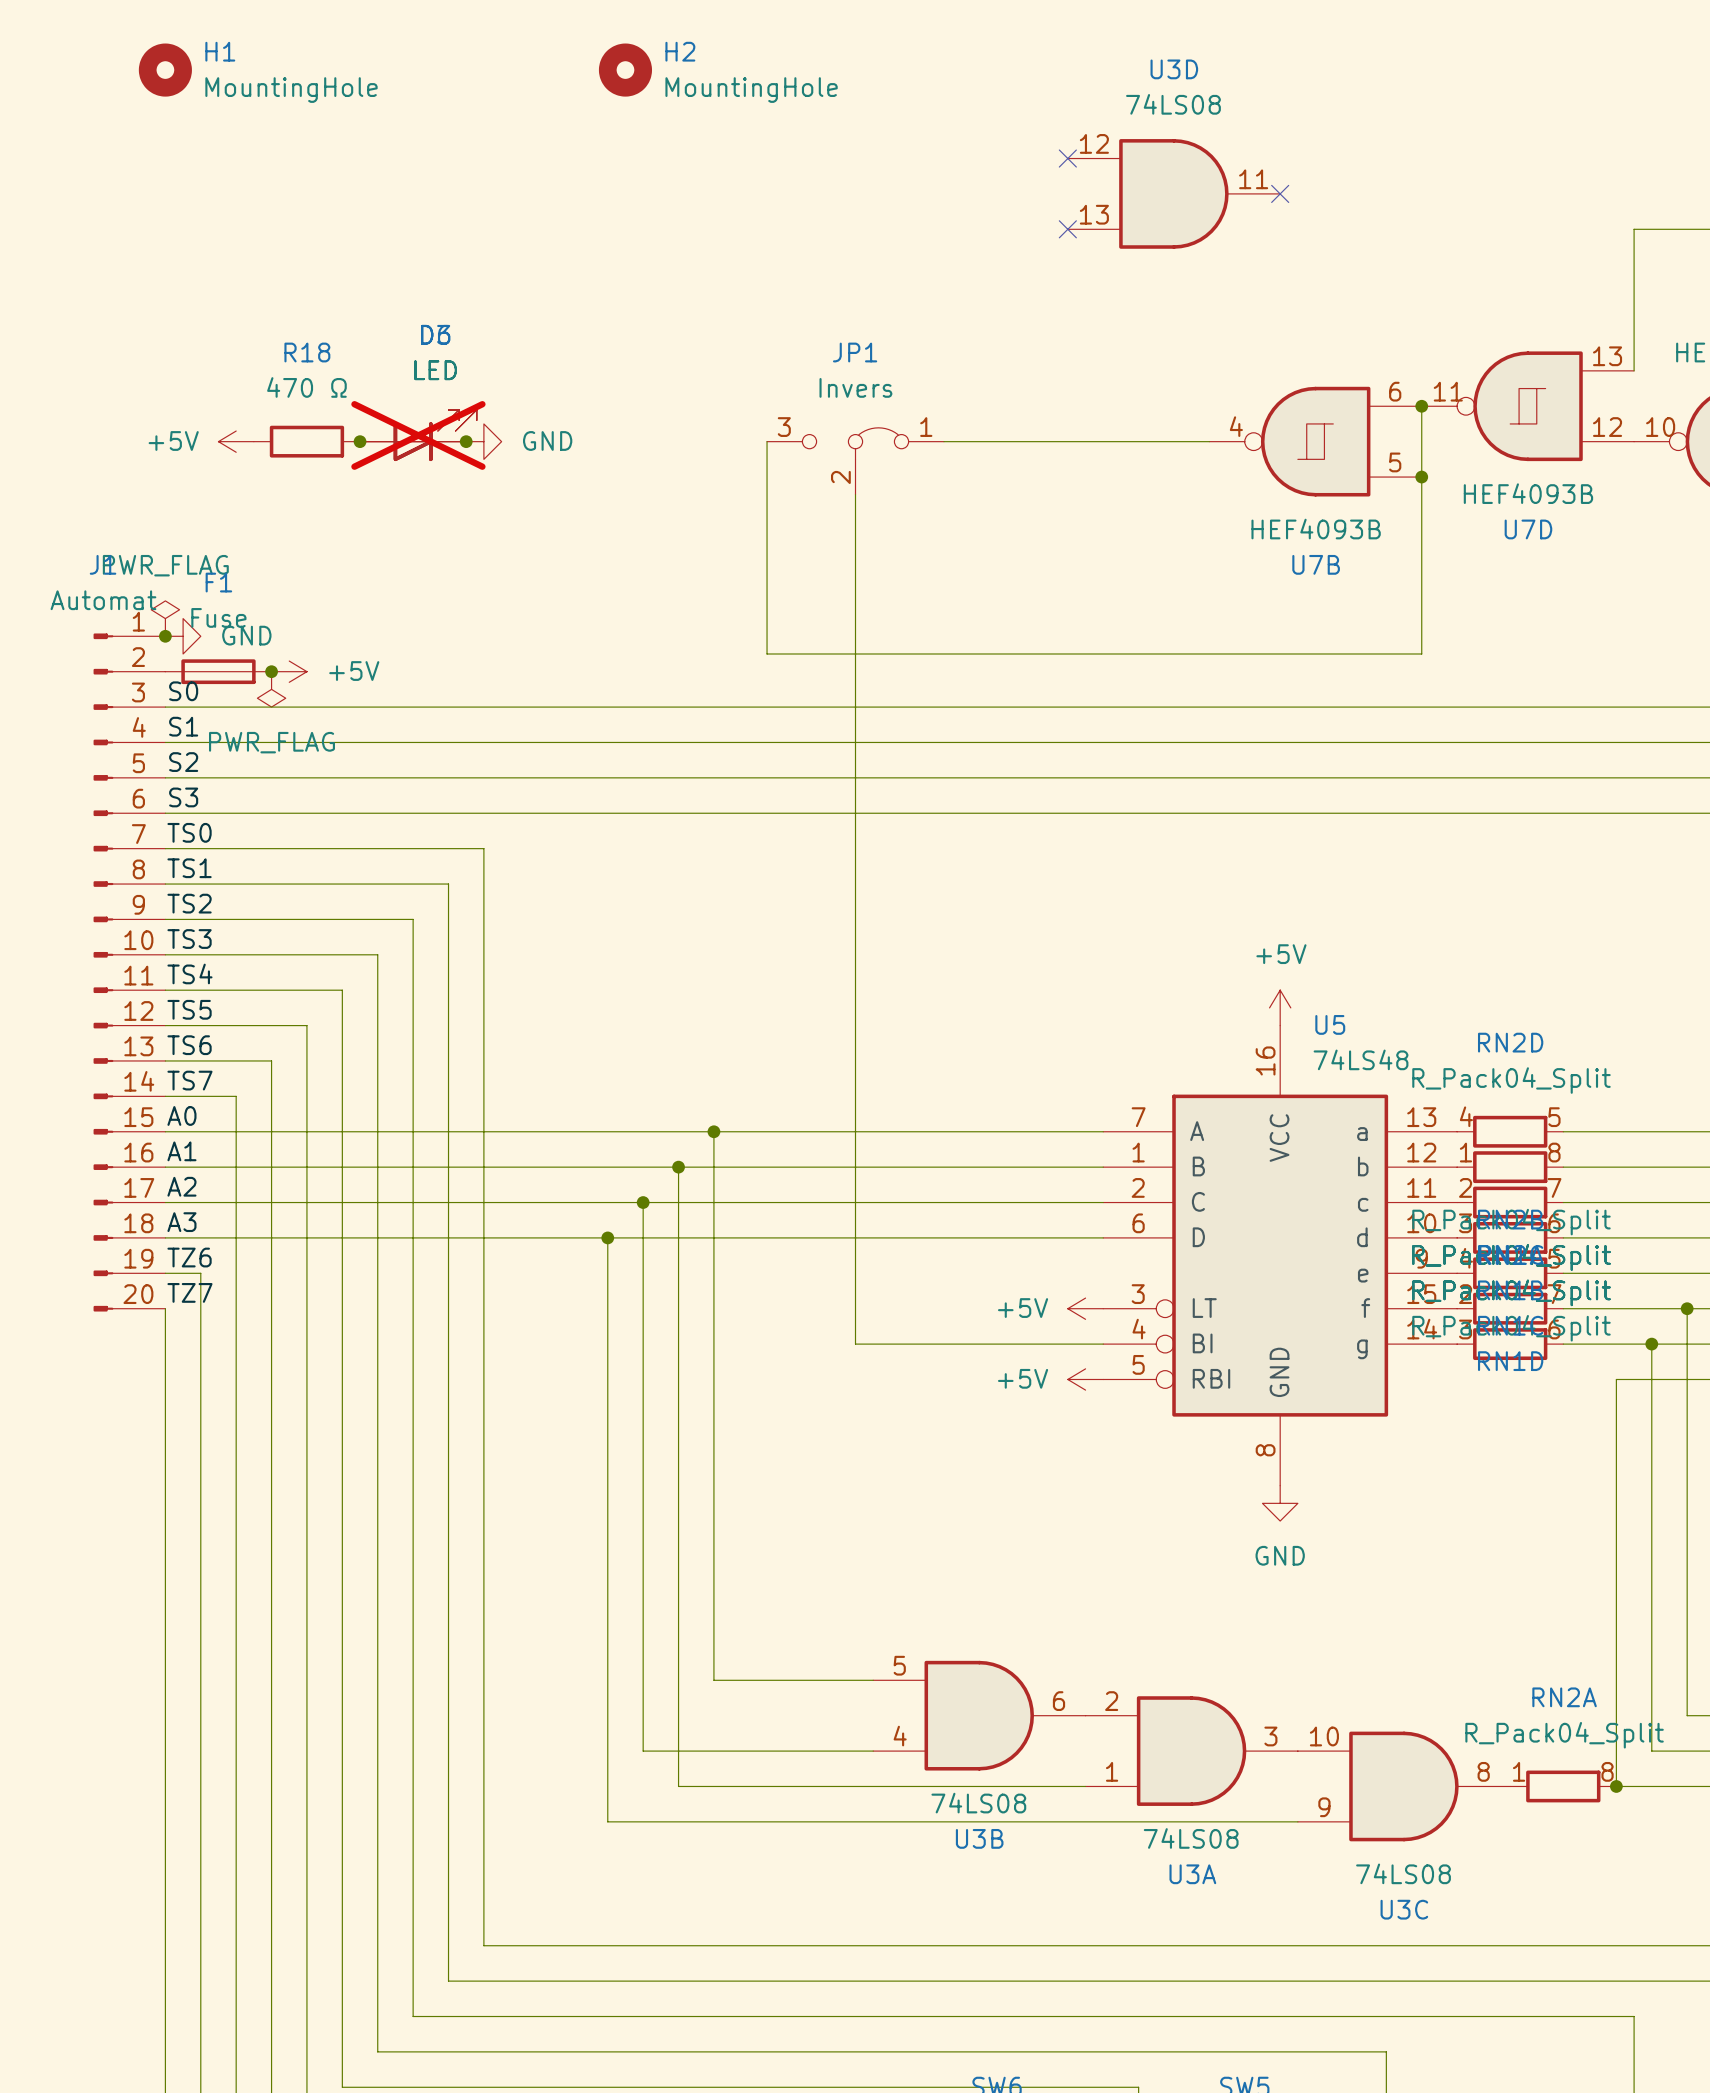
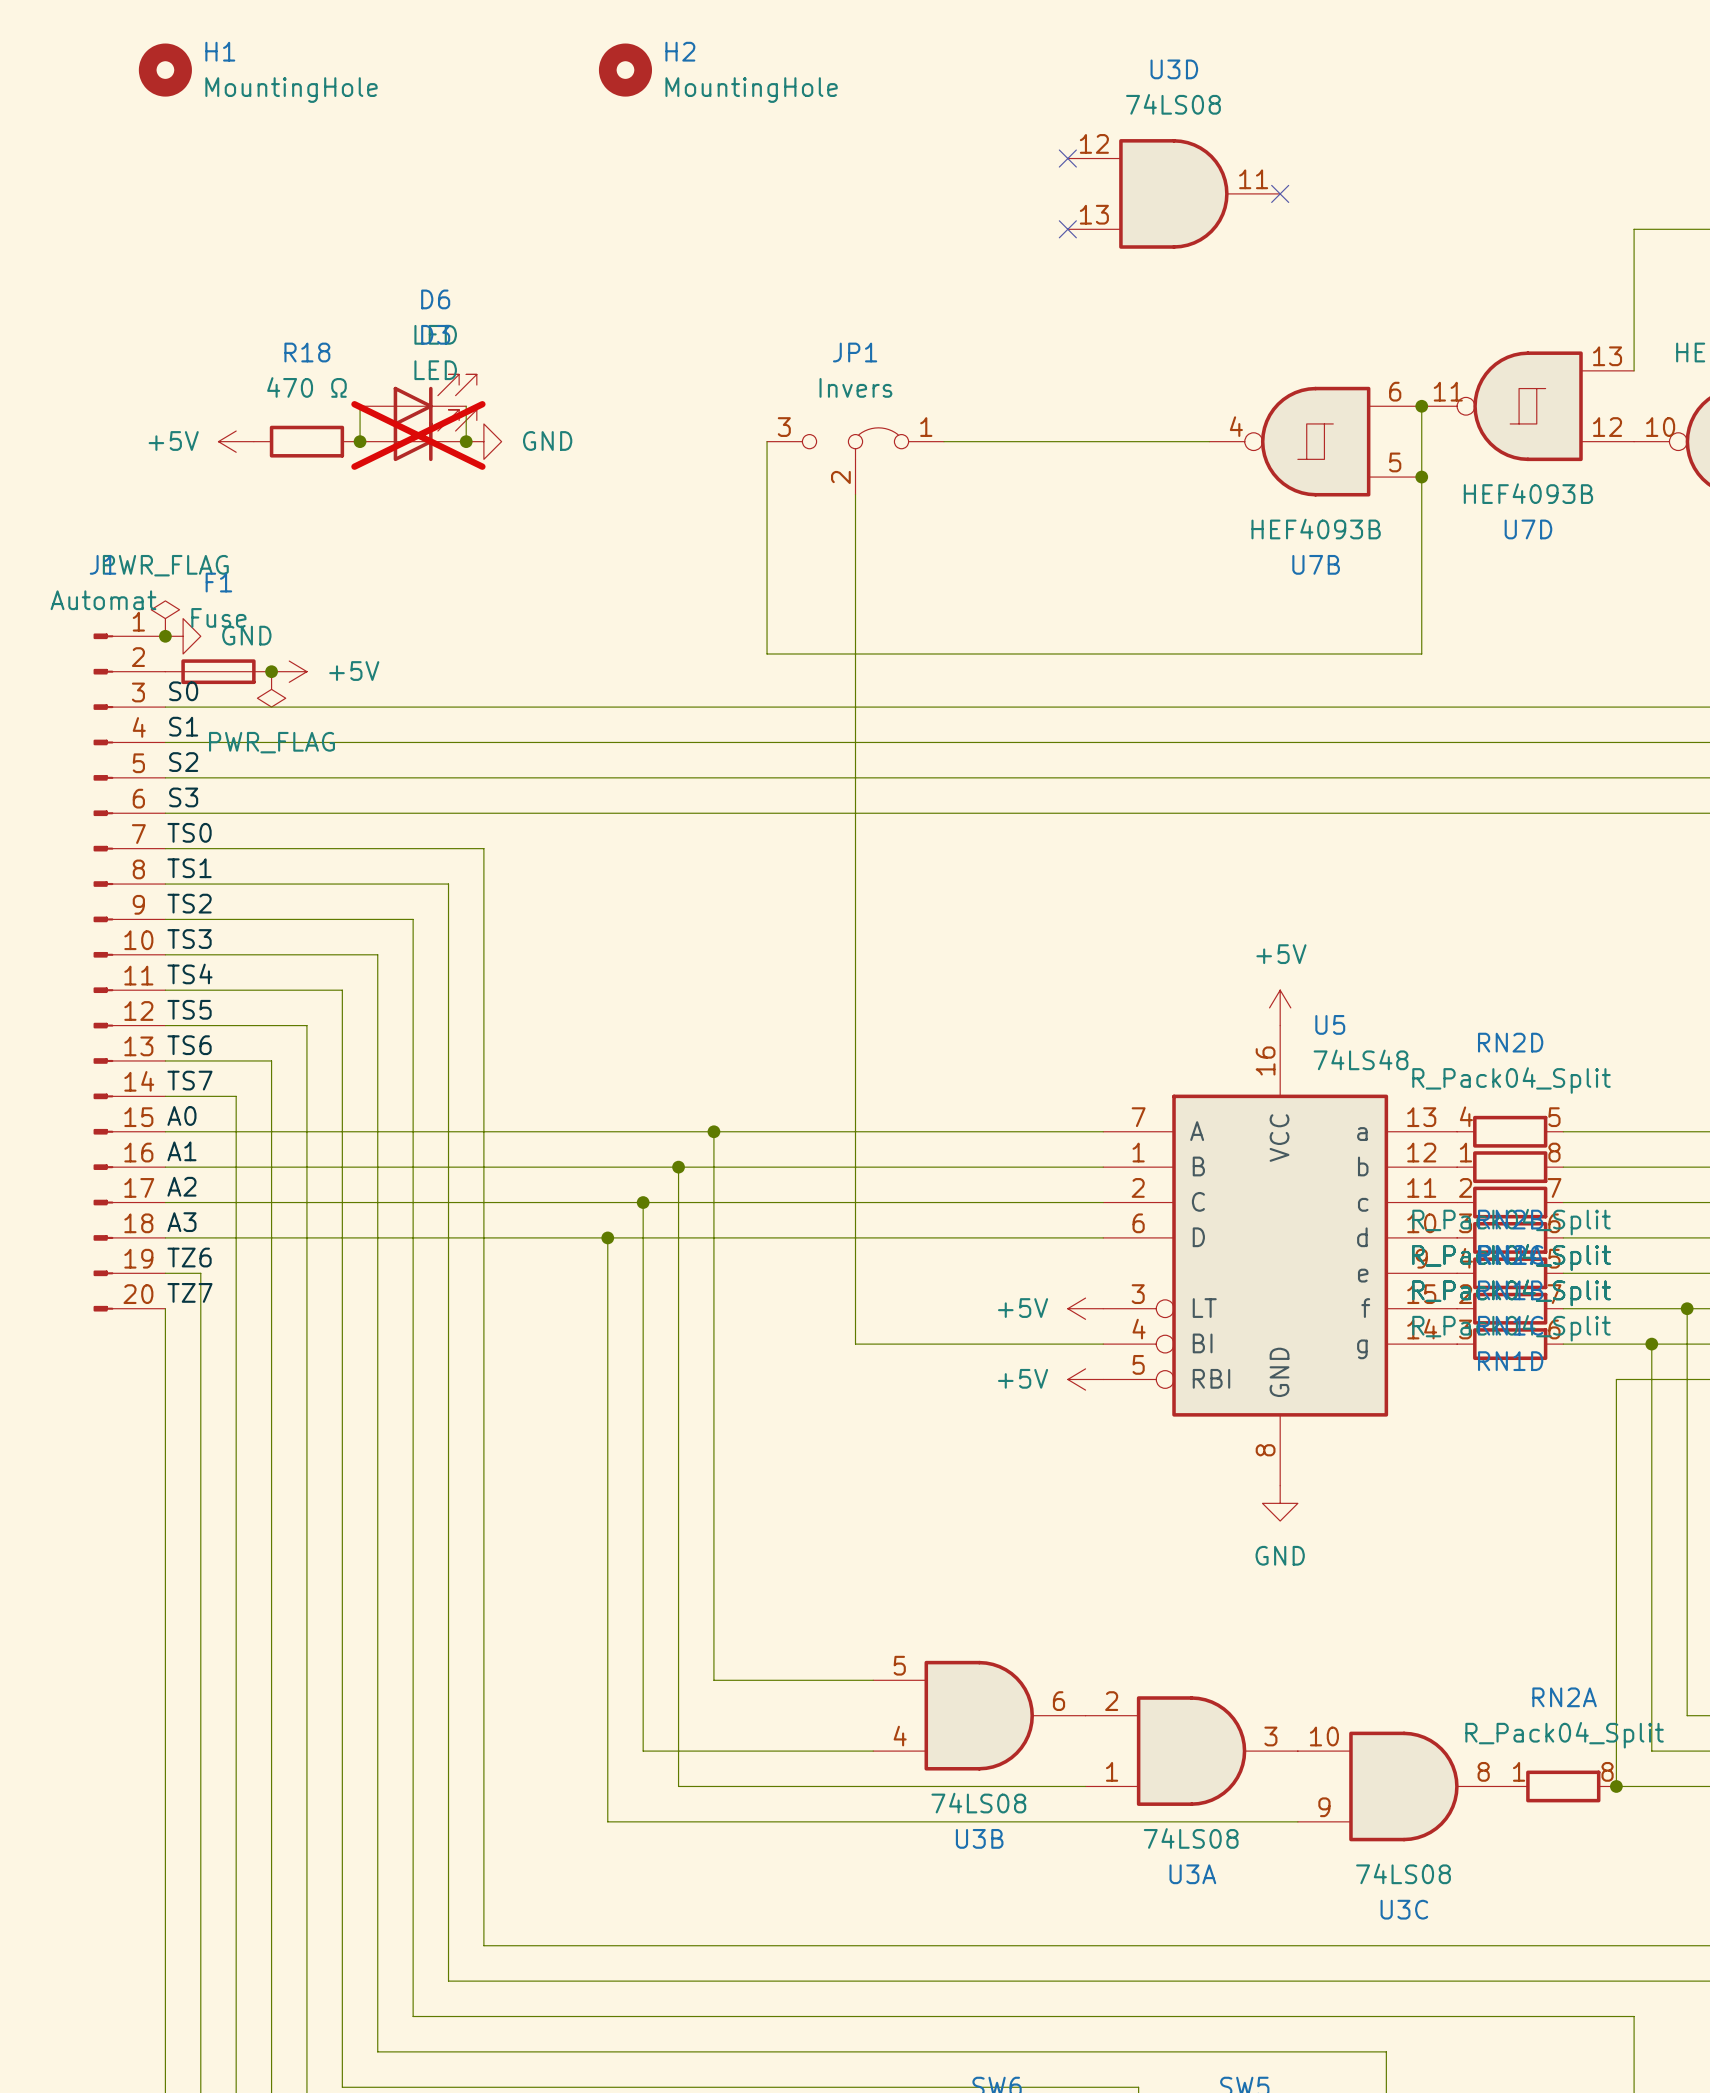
wire: none -> (360, 406) (360, 441)
wire: none -> (466, 406) (466, 441)
D6 position: (418, 435) -> (418, 400)

